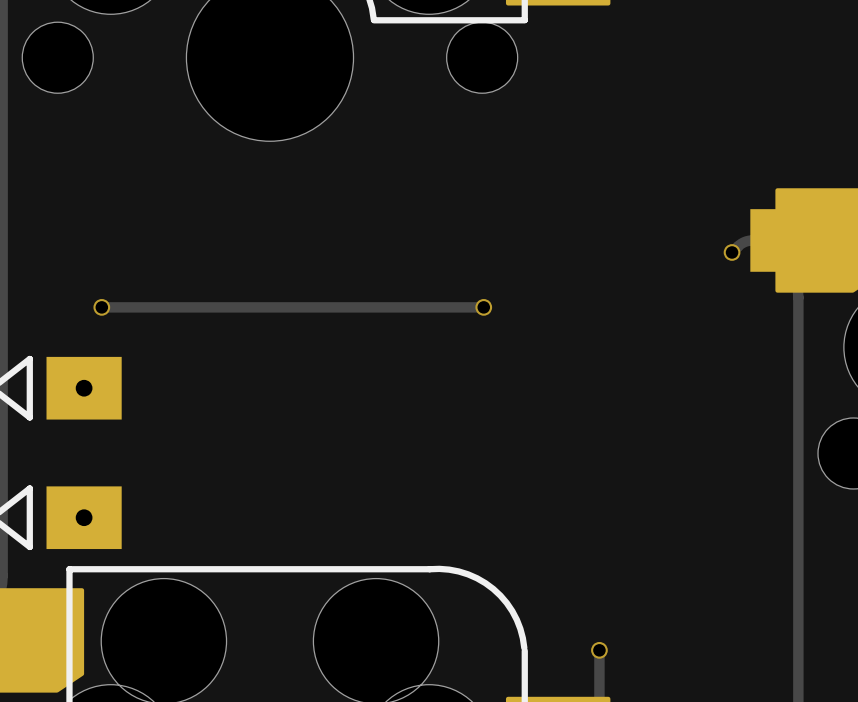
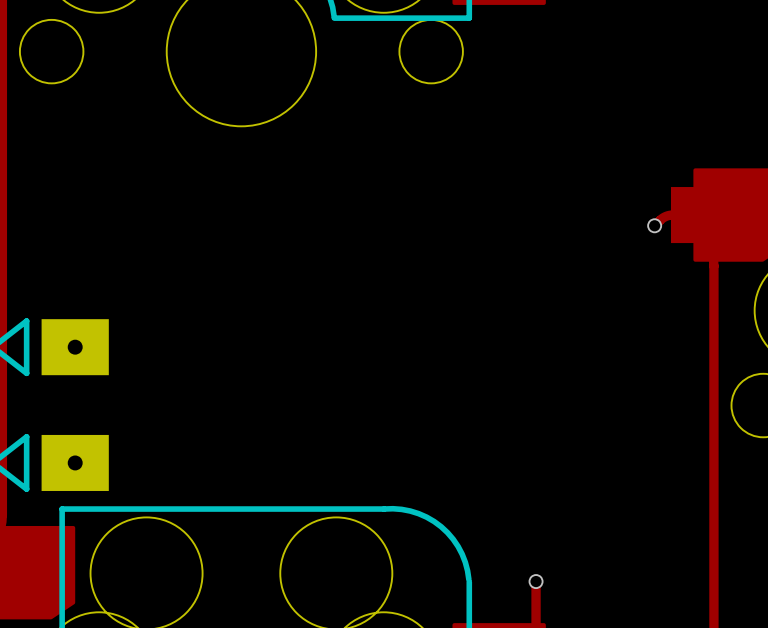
track: (101, 307) (483, 307) -> none
via: (101, 307) -> none
via: (483, 307) -> none

